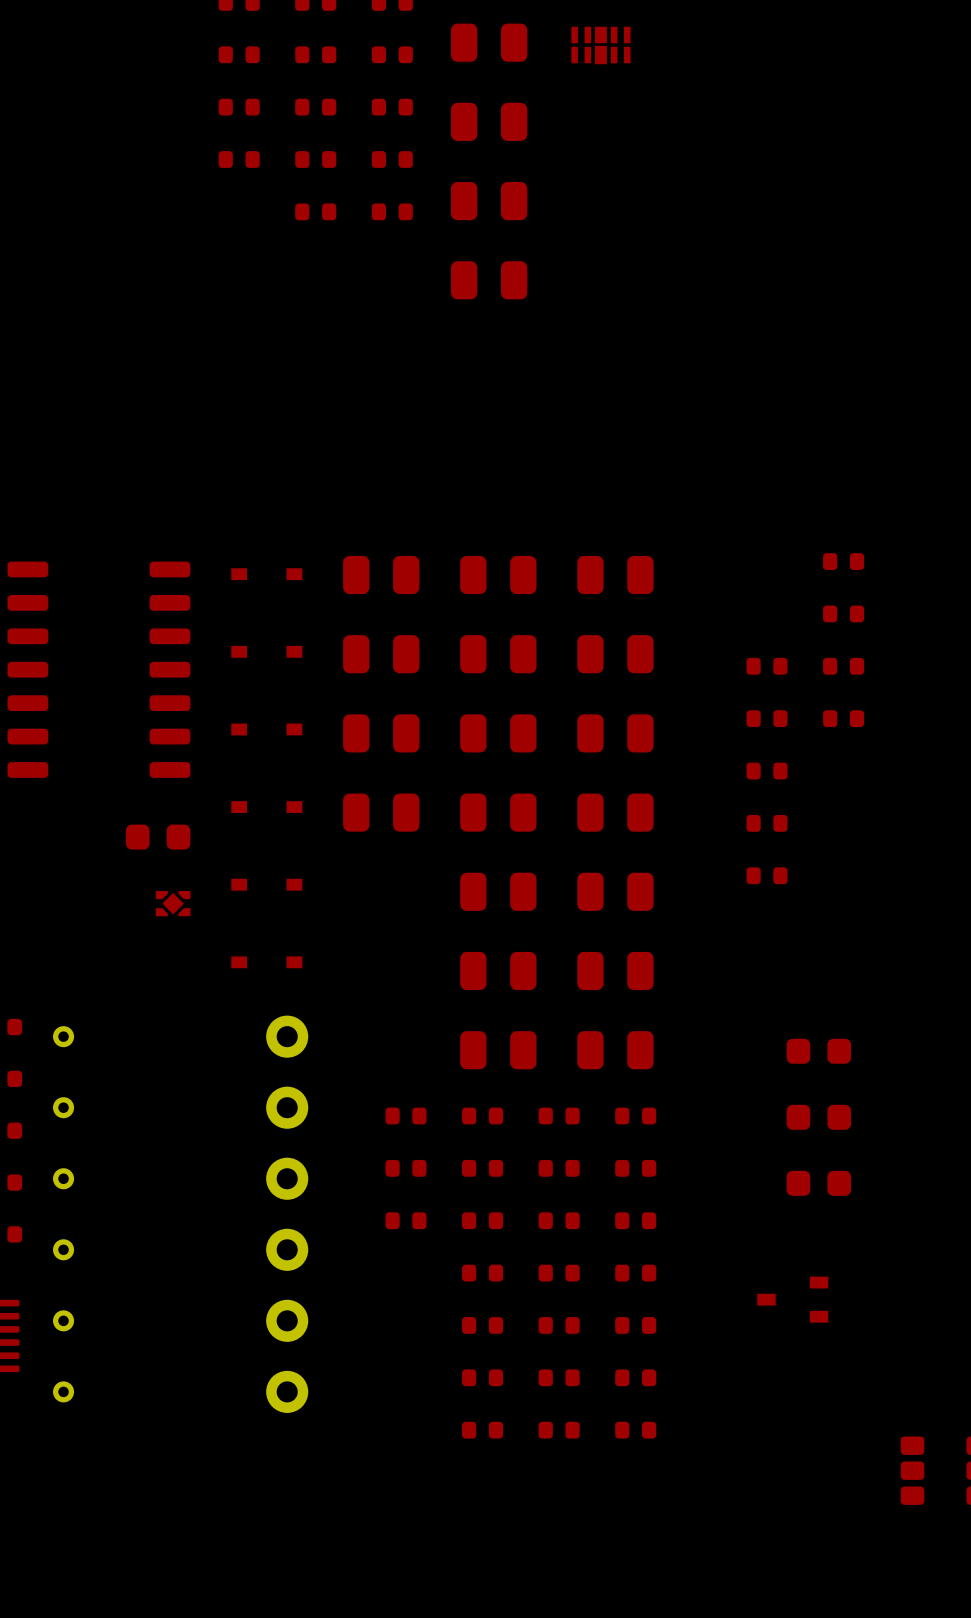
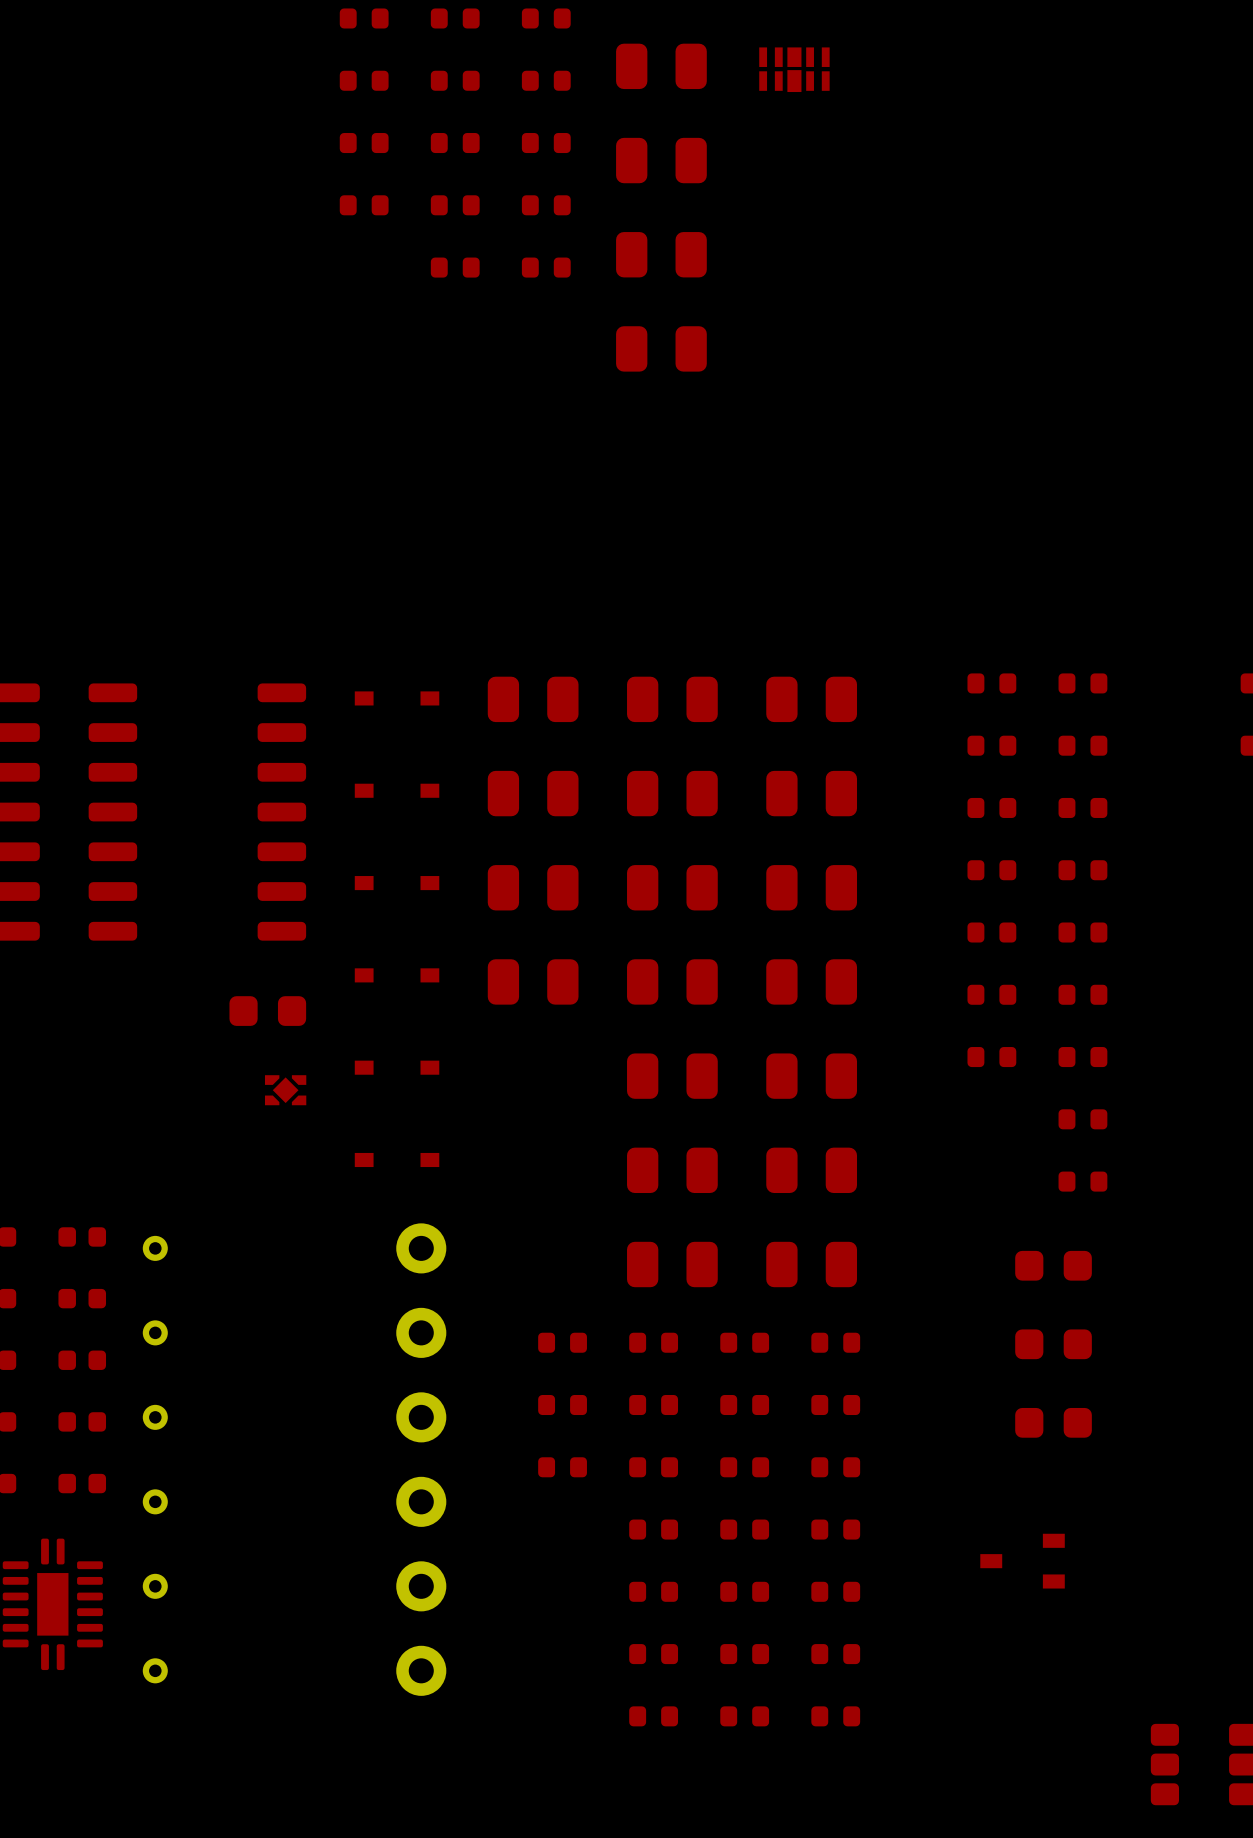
part: none -> (991, 683)
part: none -> (991, 745)
part: none -> (1082, 932)
part: none -> (1082, 994)
part: none -> (1082, 1057)
part: none -> (1082, 1119)
part: none -> (1082, 1181)

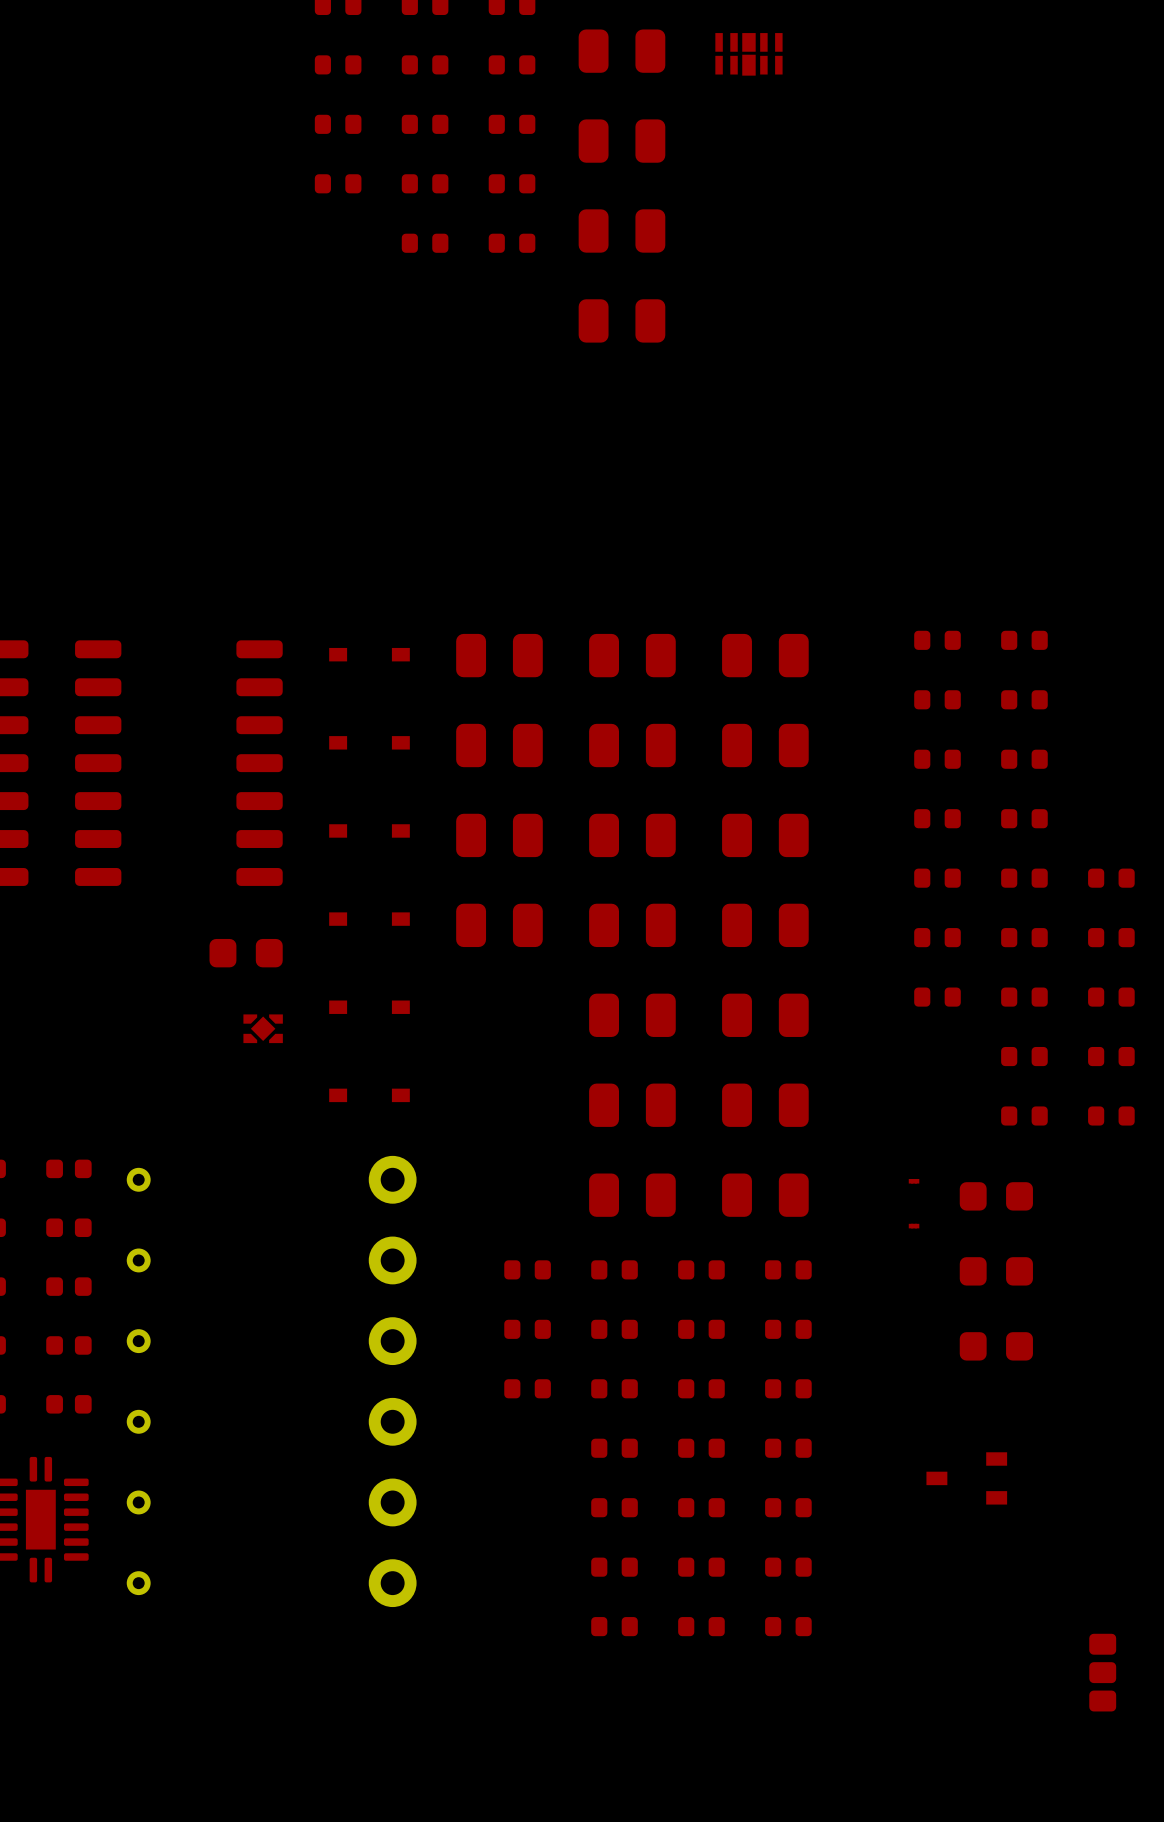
part: none -> (1111, 878)
part: none -> (1111, 937)
part: none -> (1111, 997)
part: none -> (1111, 1056)
part: none -> (1111, 1115)
part: none -> (914, 1181)
part: none -> (914, 1226)

